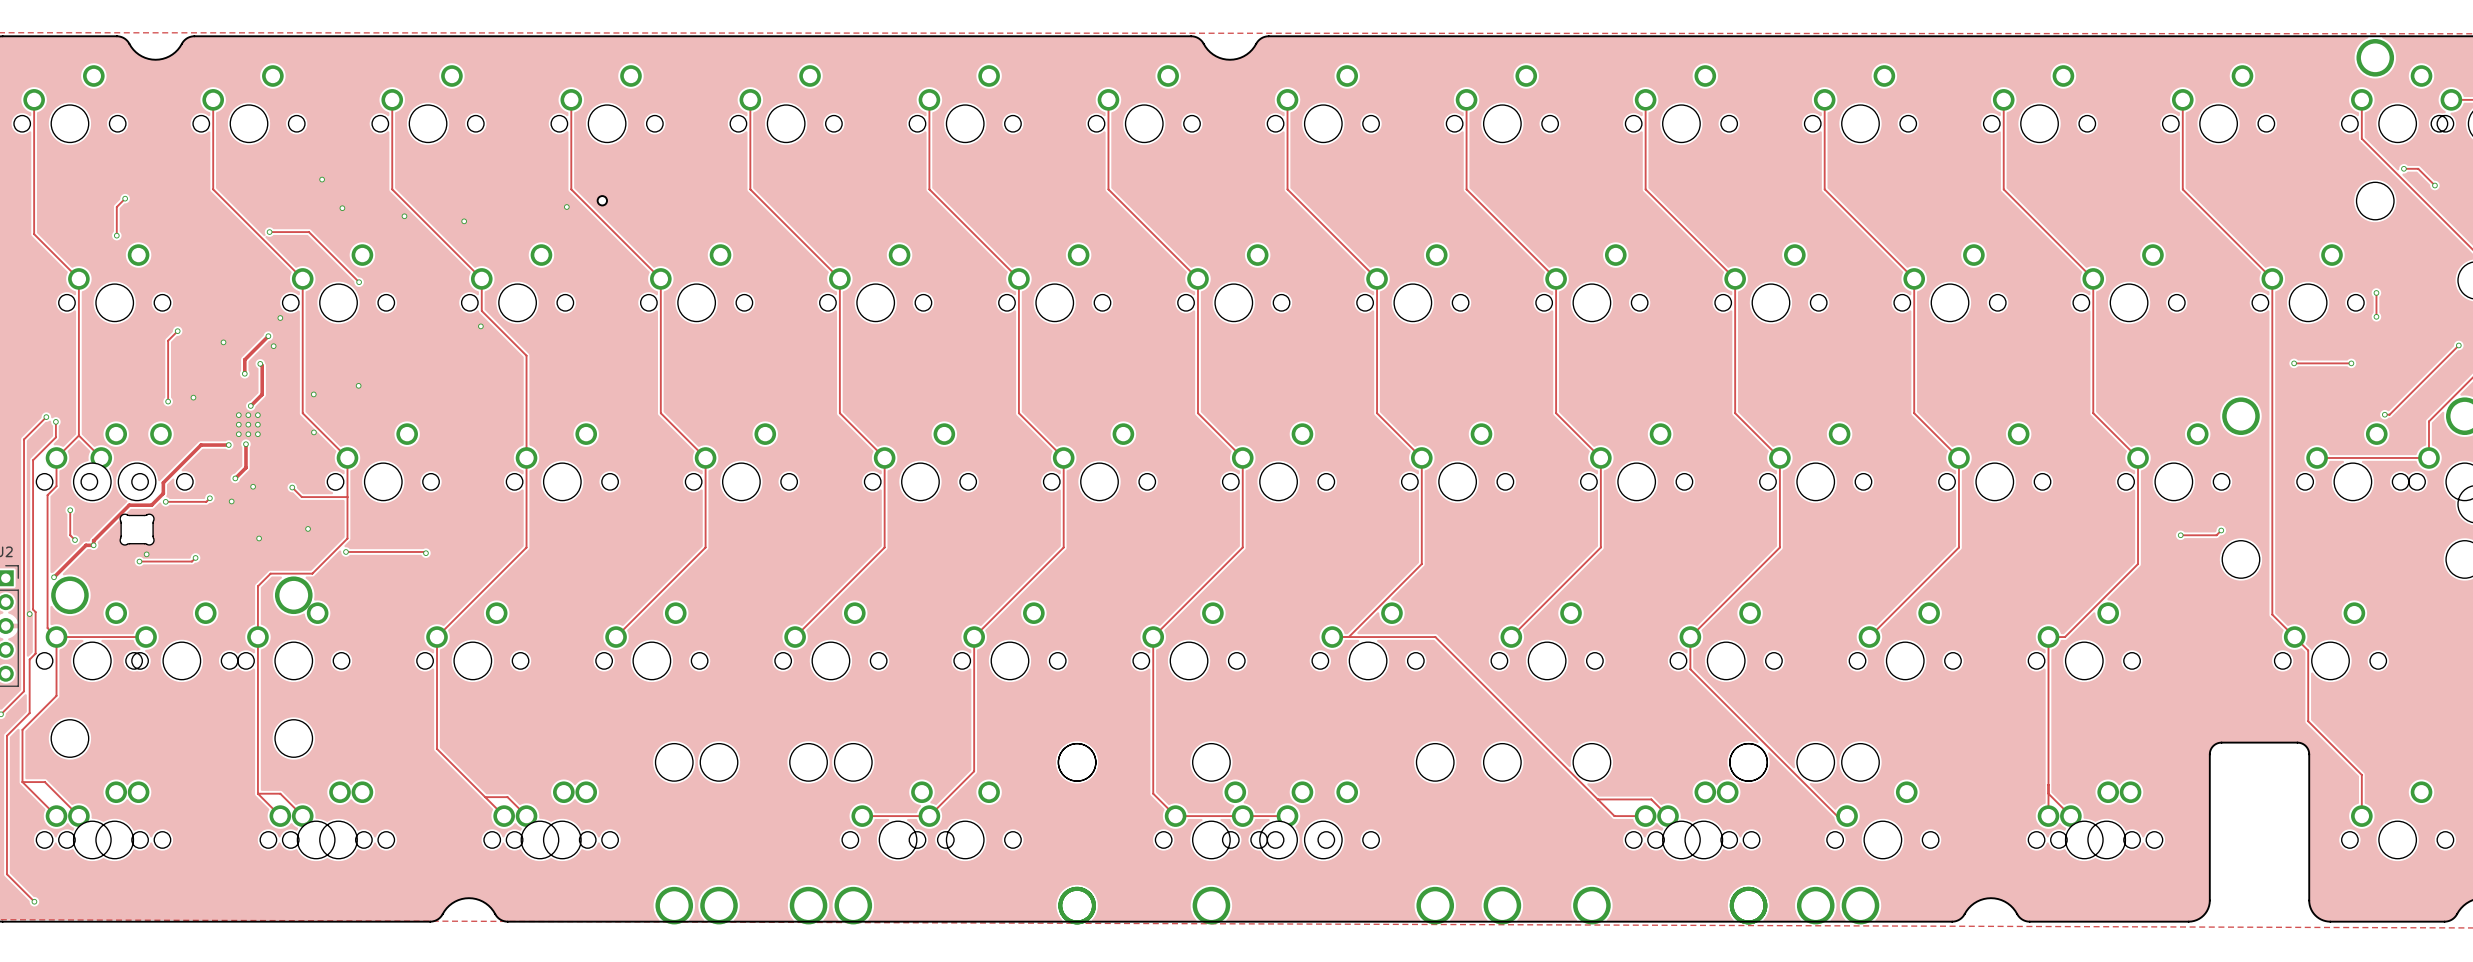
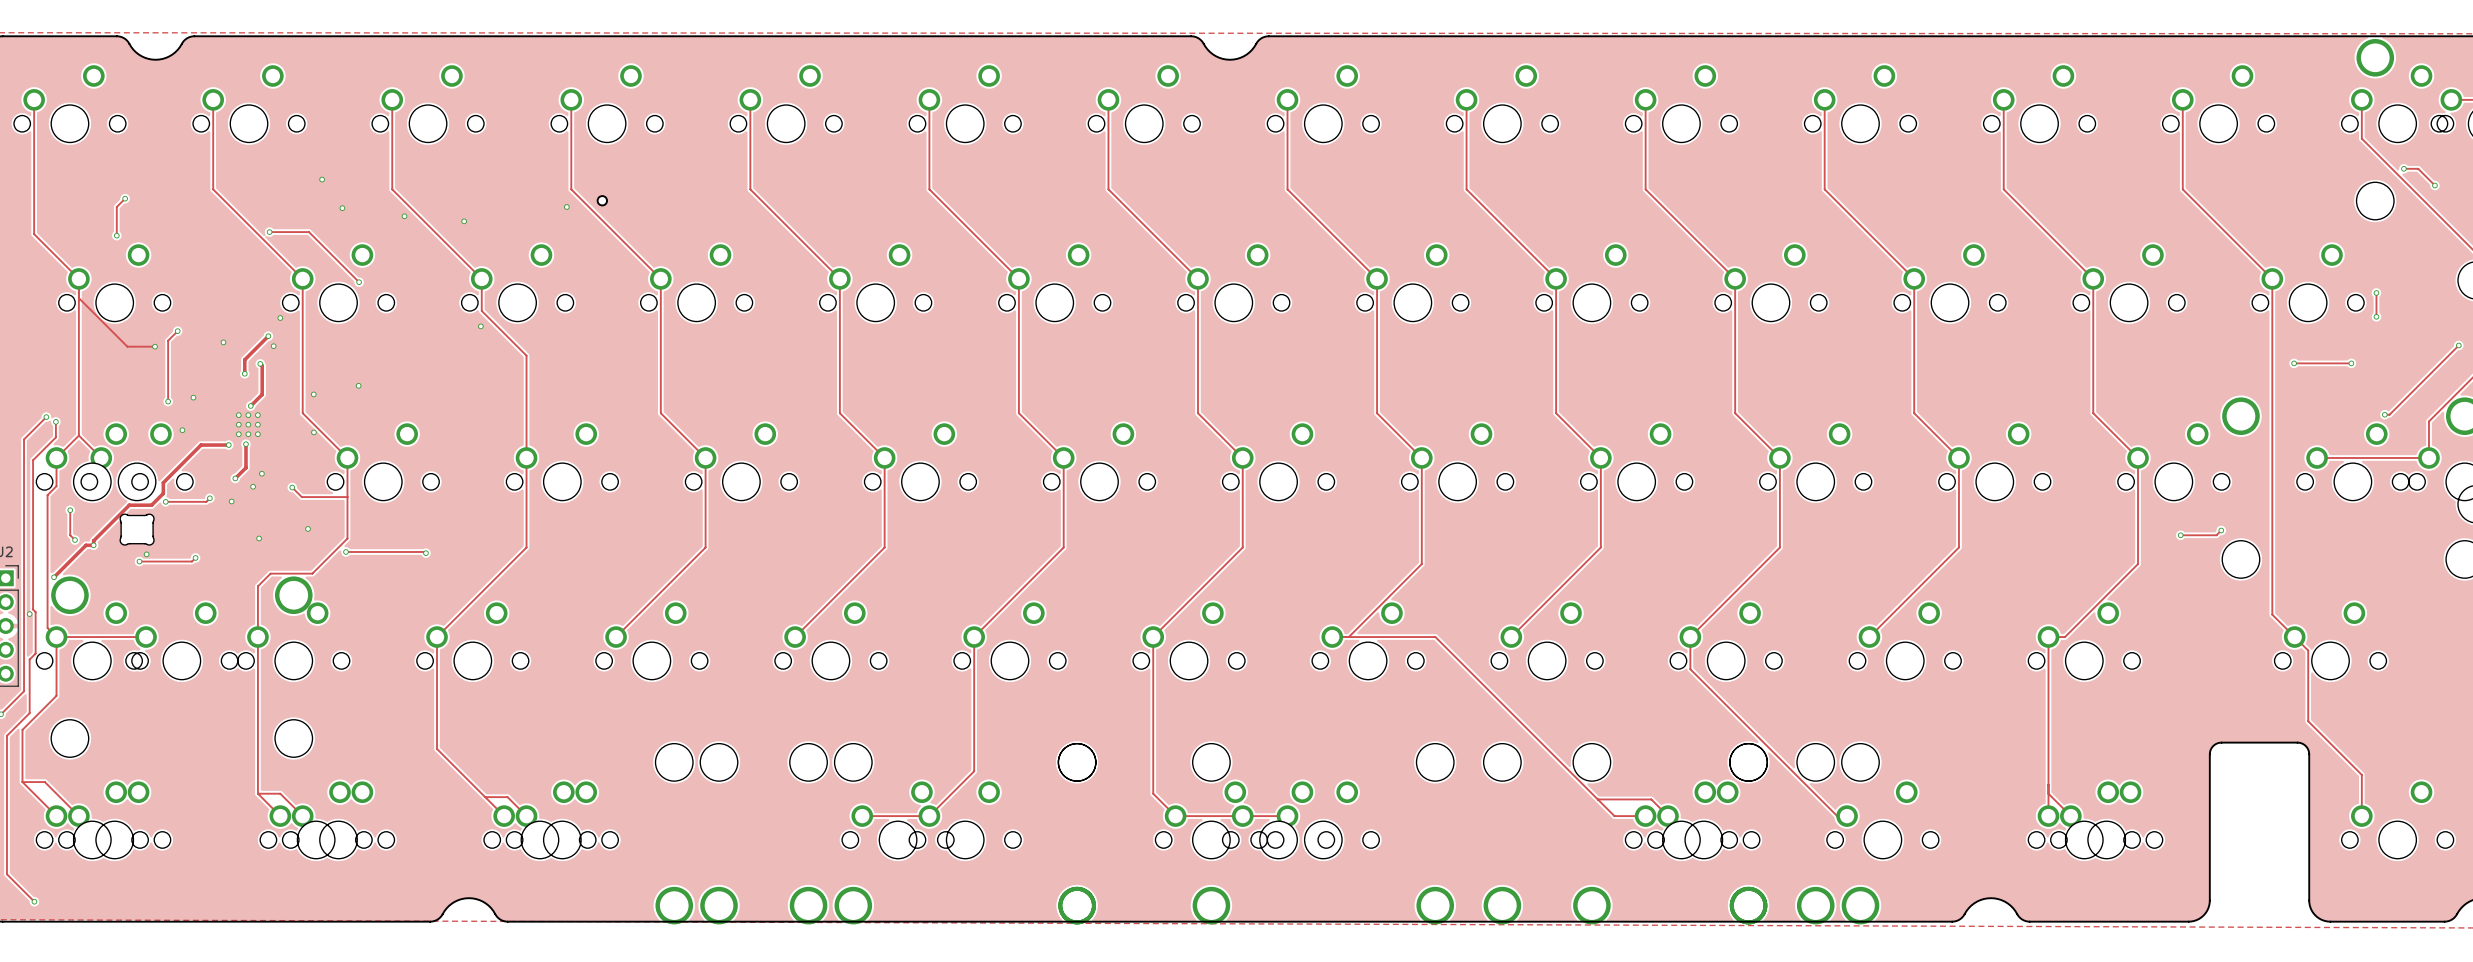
track: none -> (78, 298) (127, 346) (154, 346)
via: none -> (154, 346)
via: none -> (182, 430)
via: none -> (261, 473)

